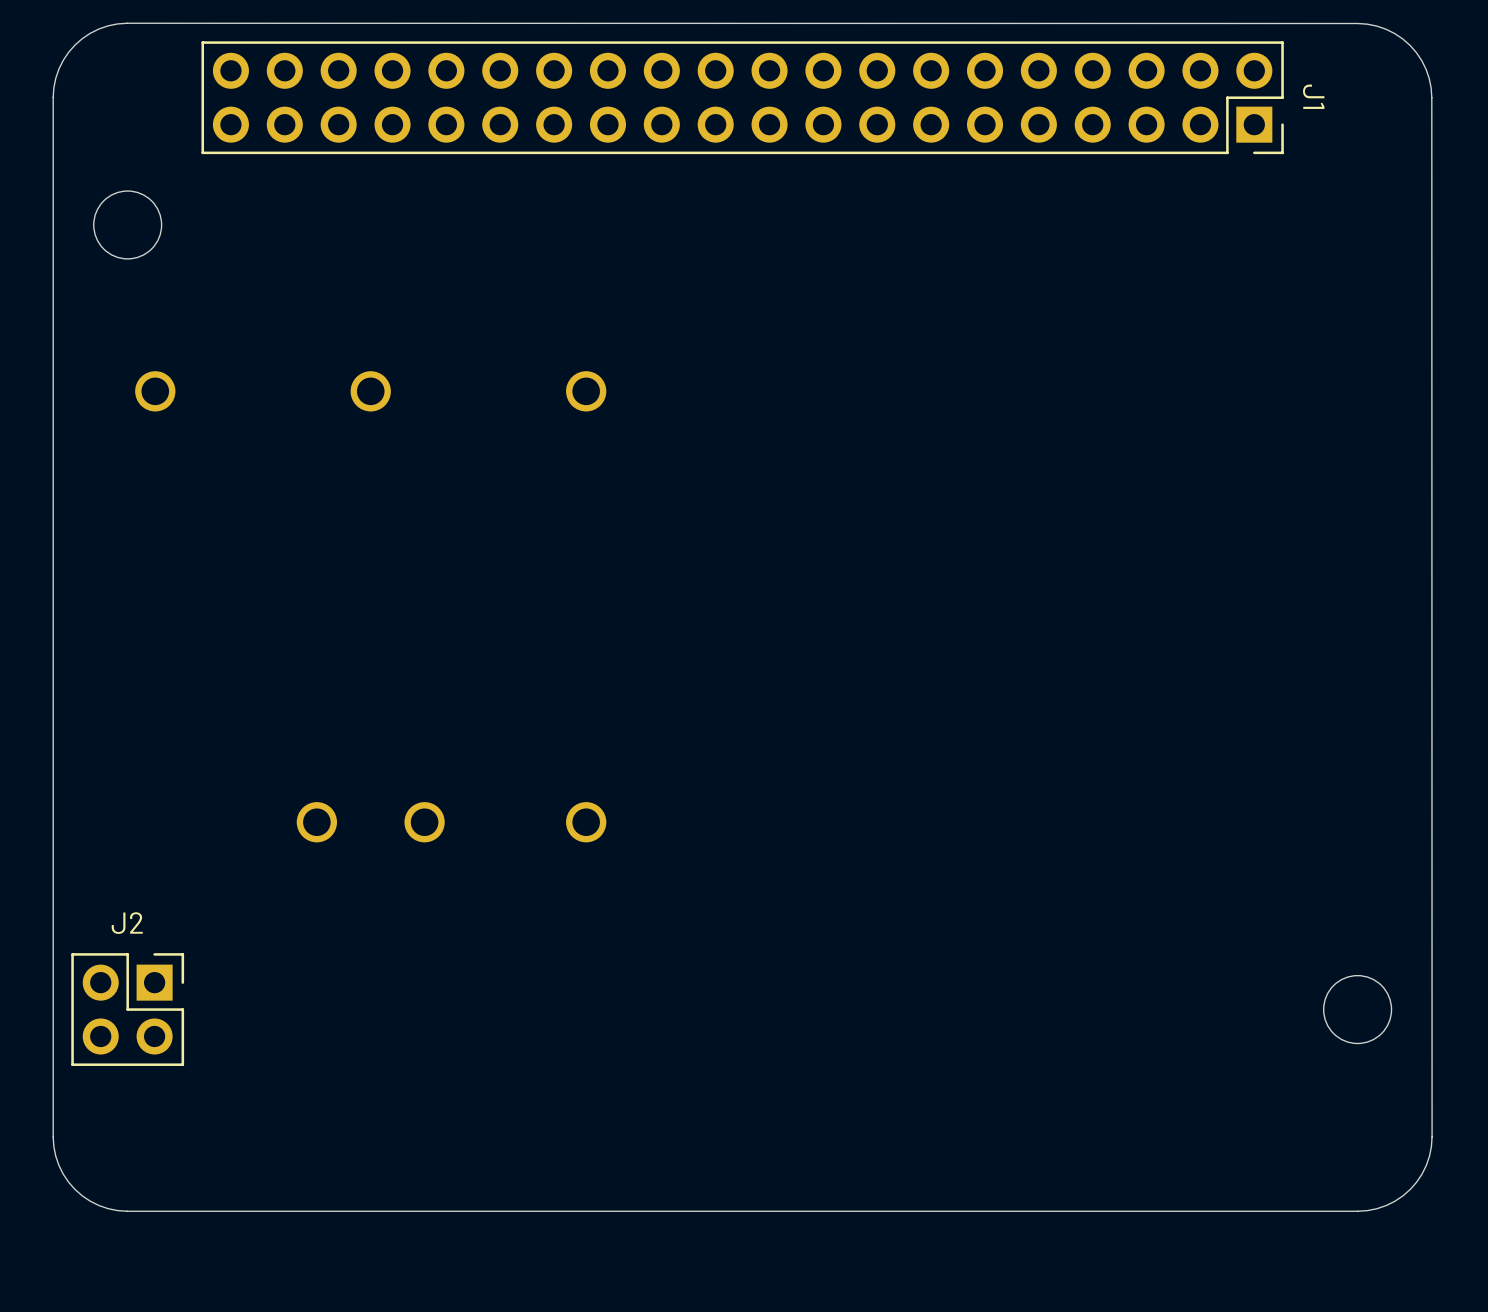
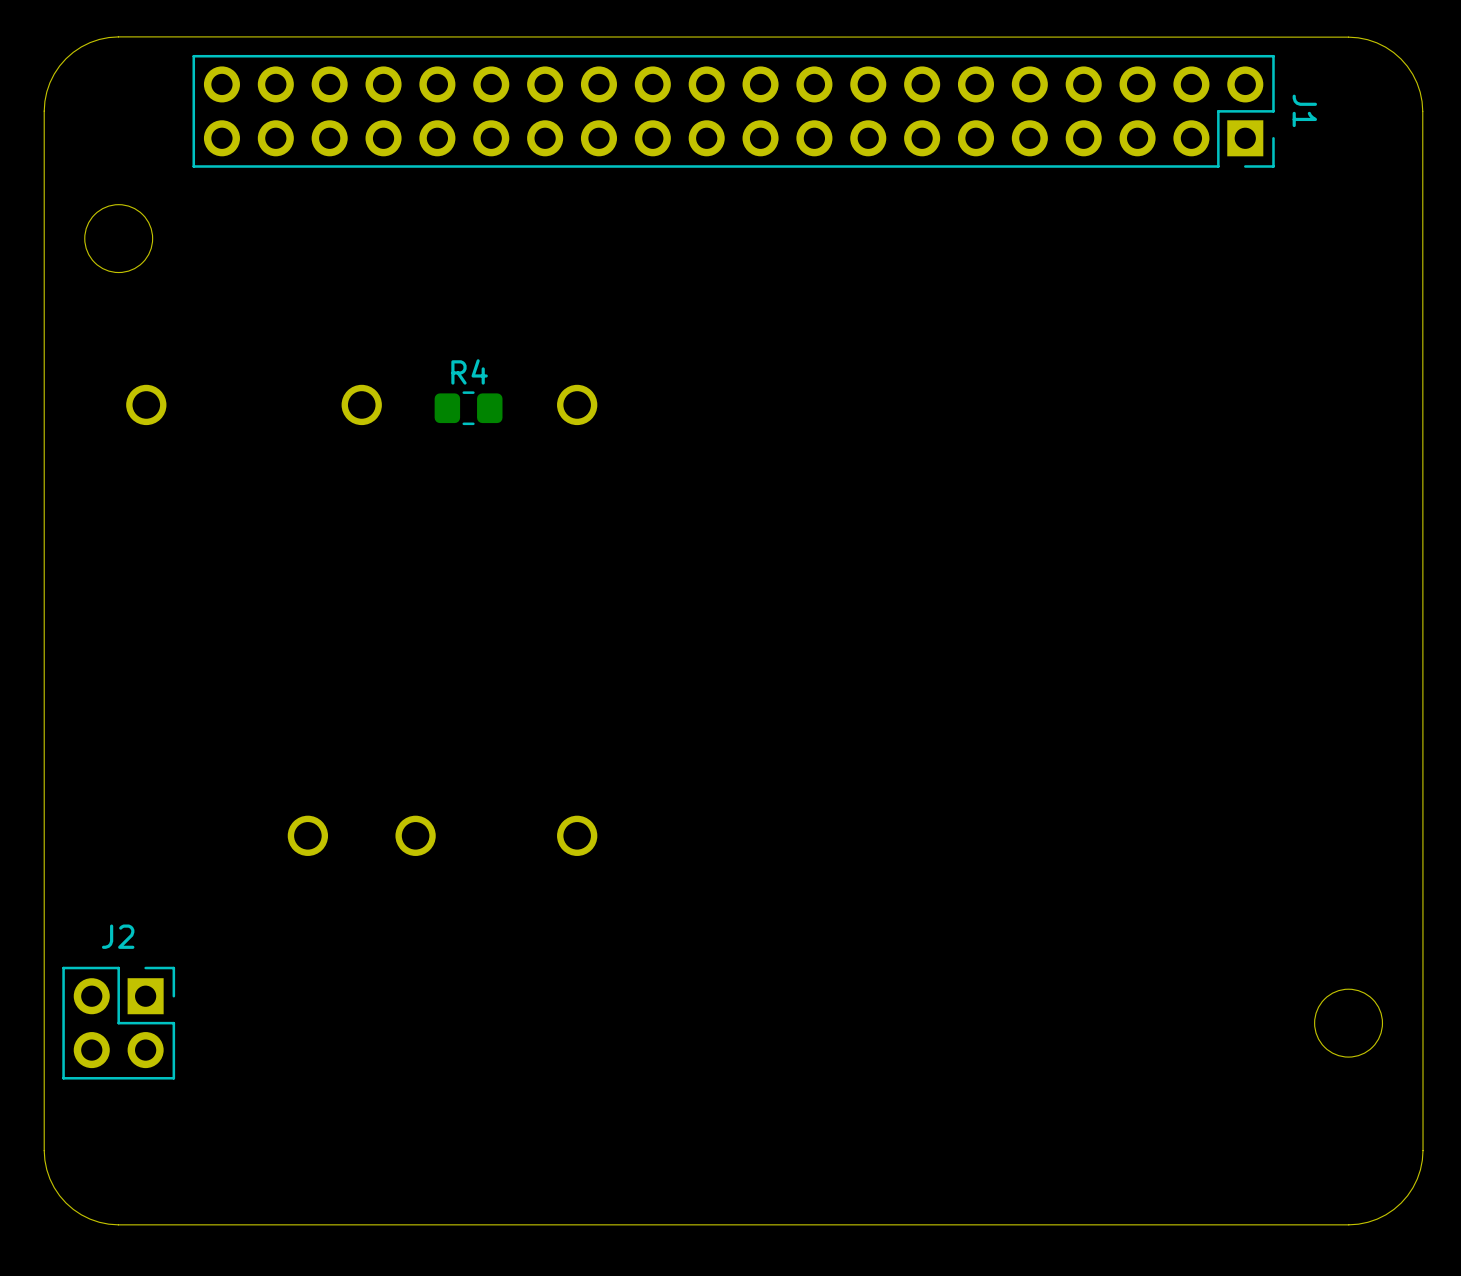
R4: none -> (468, 408)

